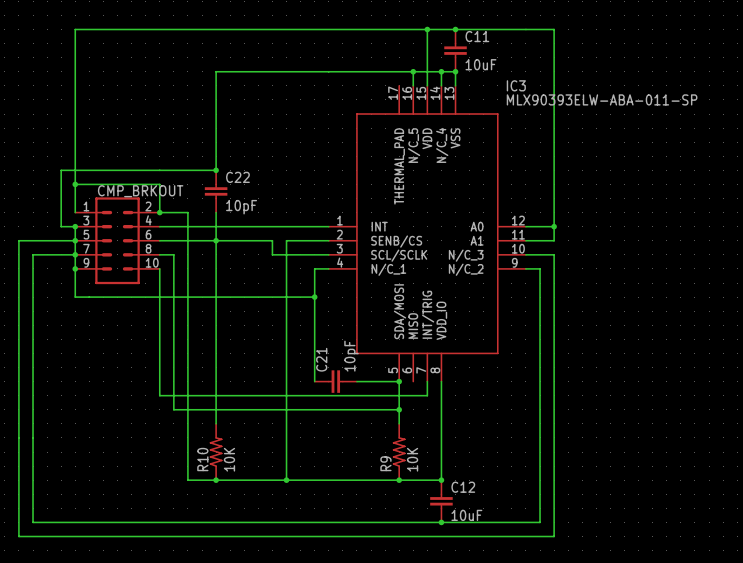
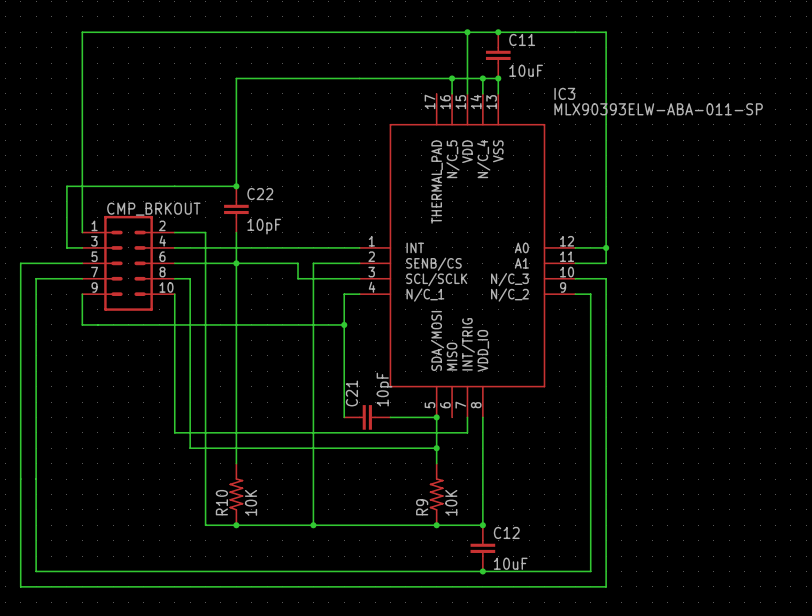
wire: (75, 184) (159, 184) (159, 212) -> none
junction: (75, 184) -> none
junction: (159, 212) -> none
wire: (75, 226) (75, 268) -> none
junction: (75, 226) -> none
junction: (75, 240) -> none
junction: (75, 254) -> none
junction: (75, 268) -> none

